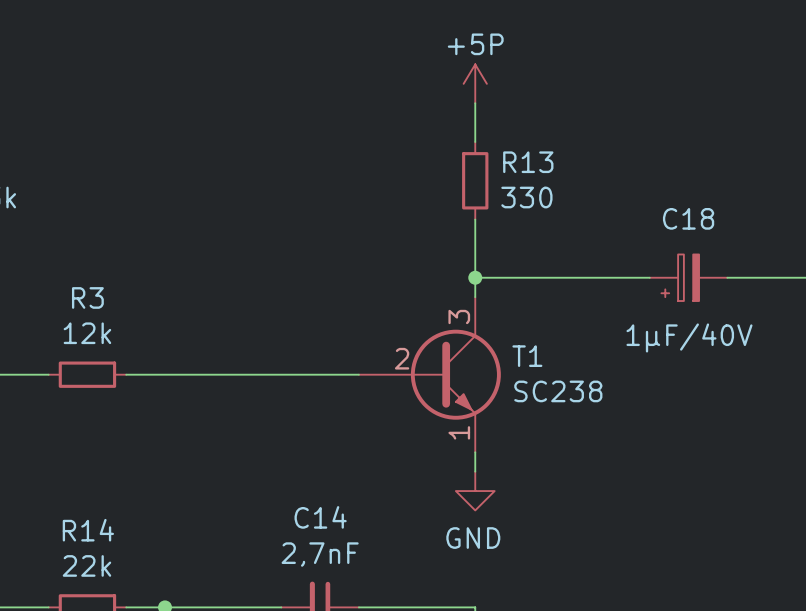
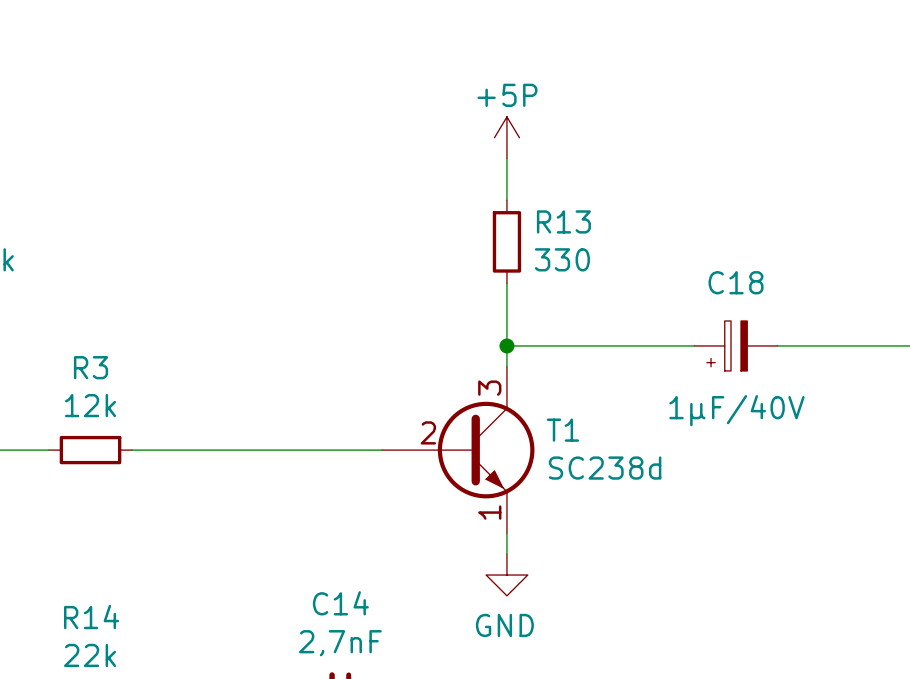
T1 value: SC238 (558, 391) -> SC238d (605, 468)

